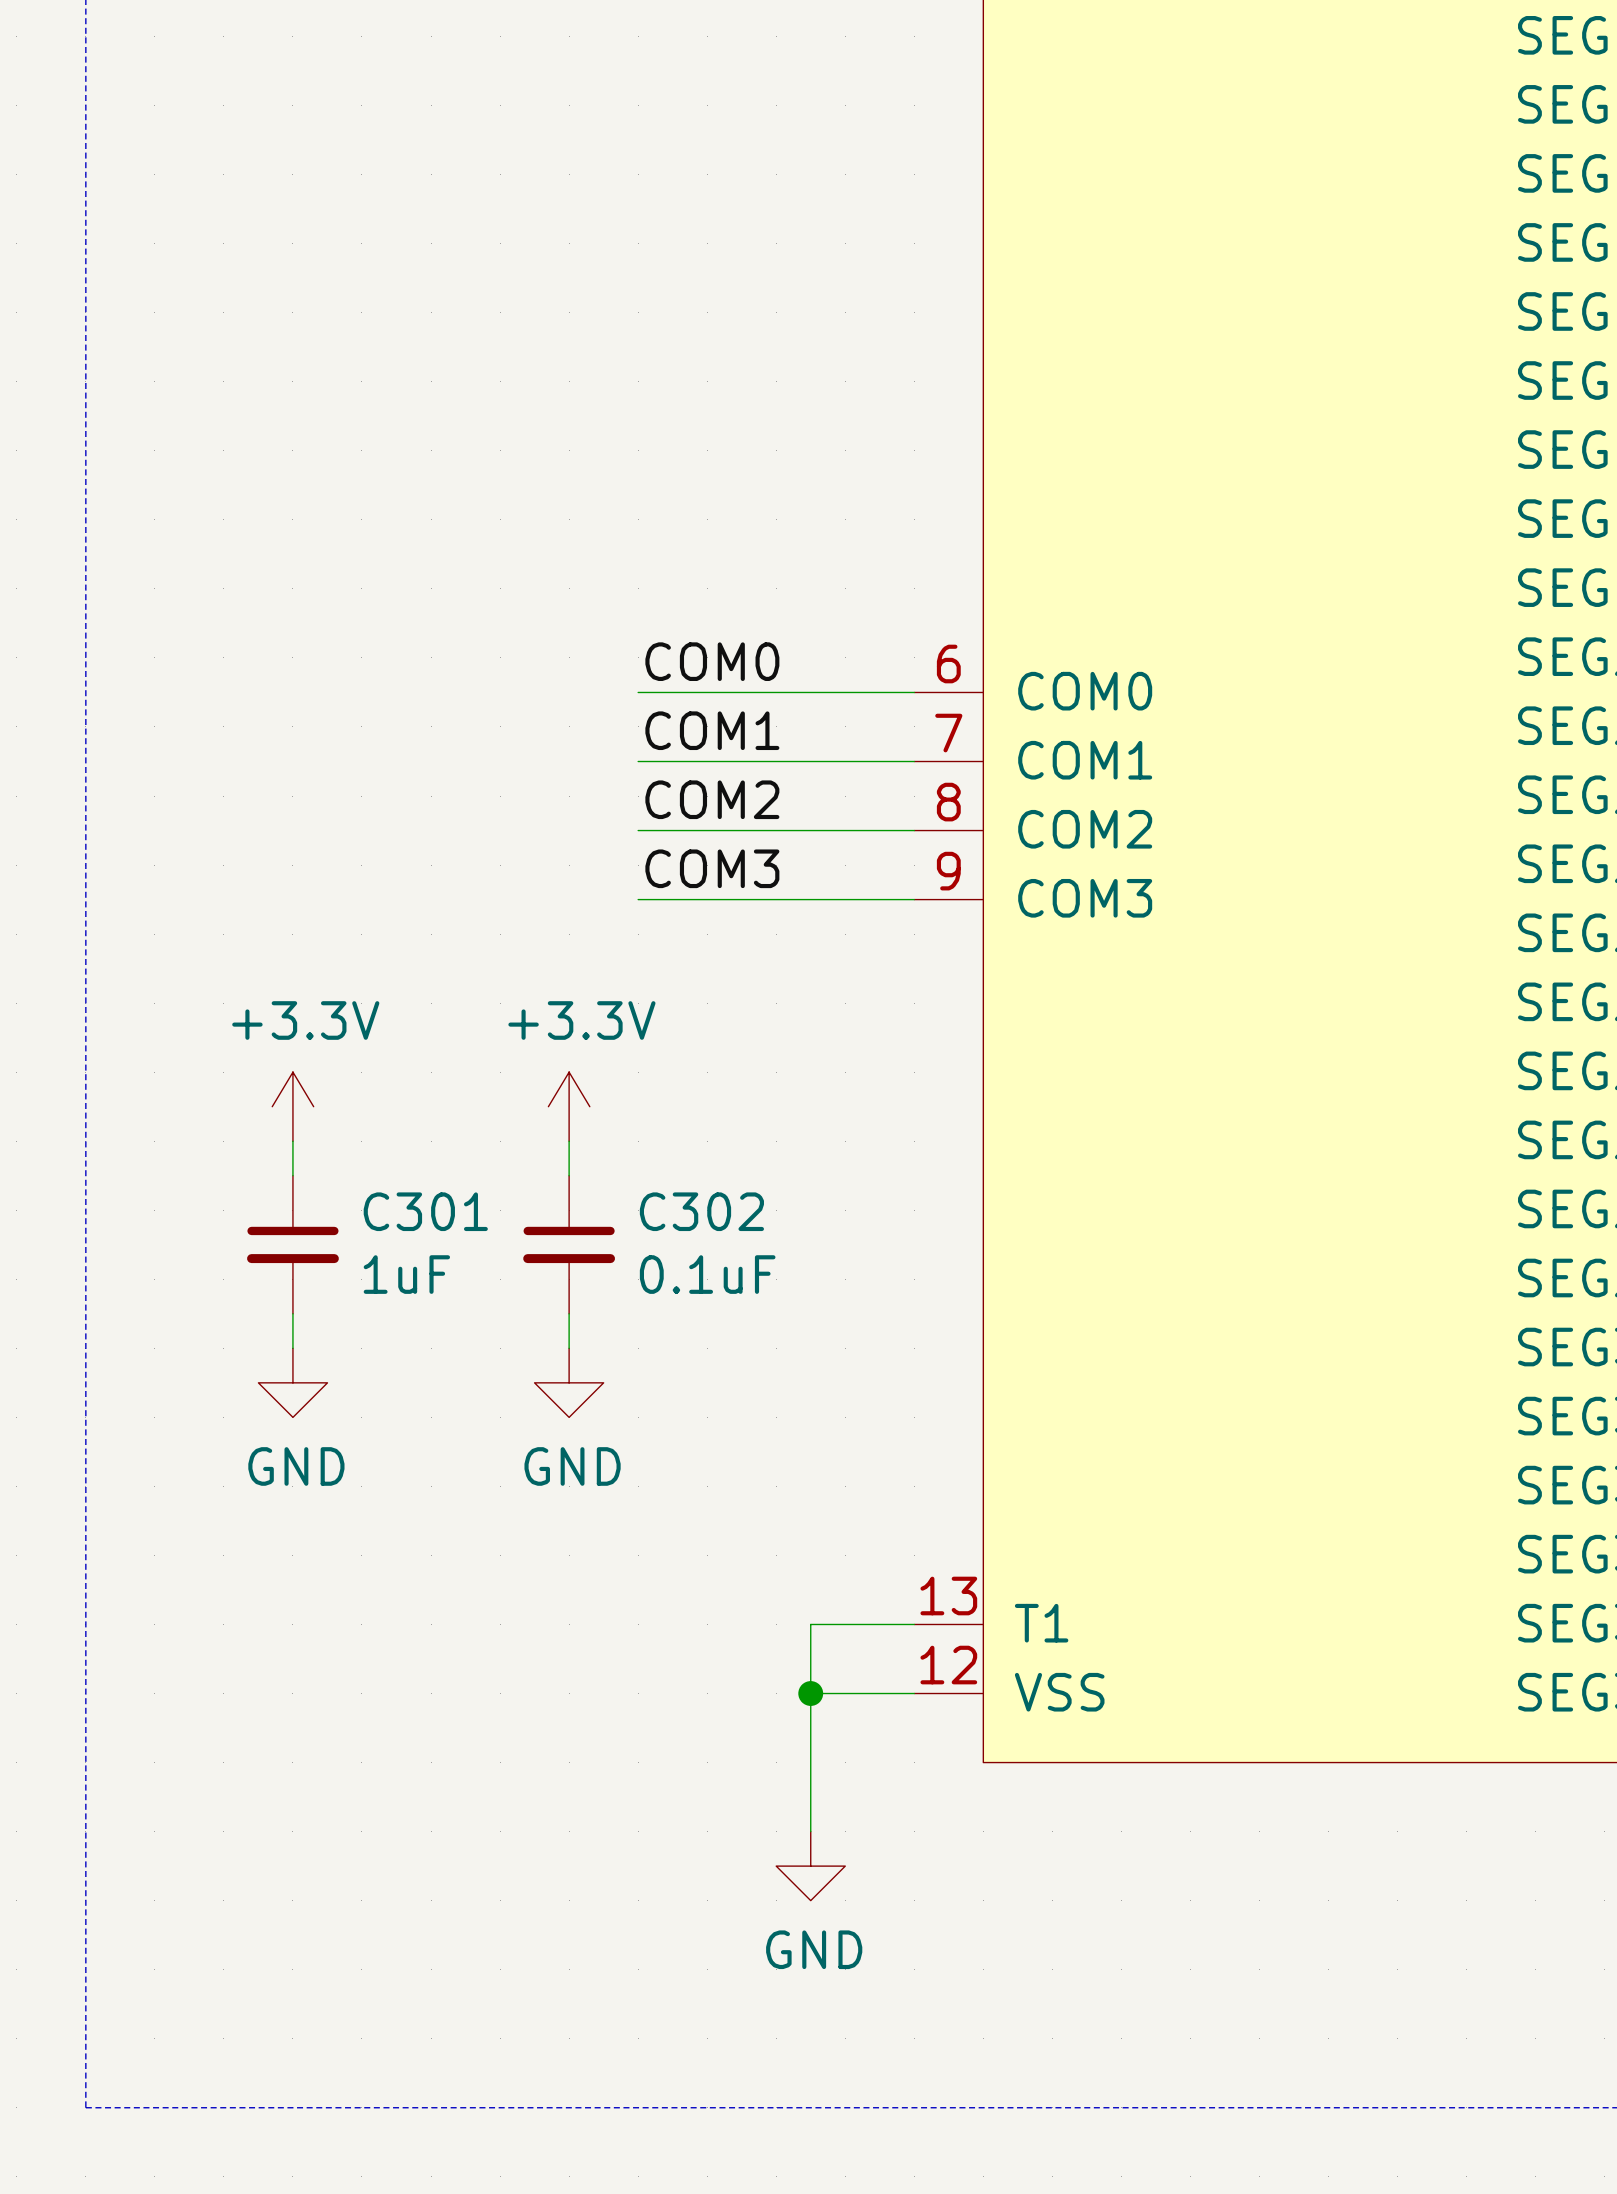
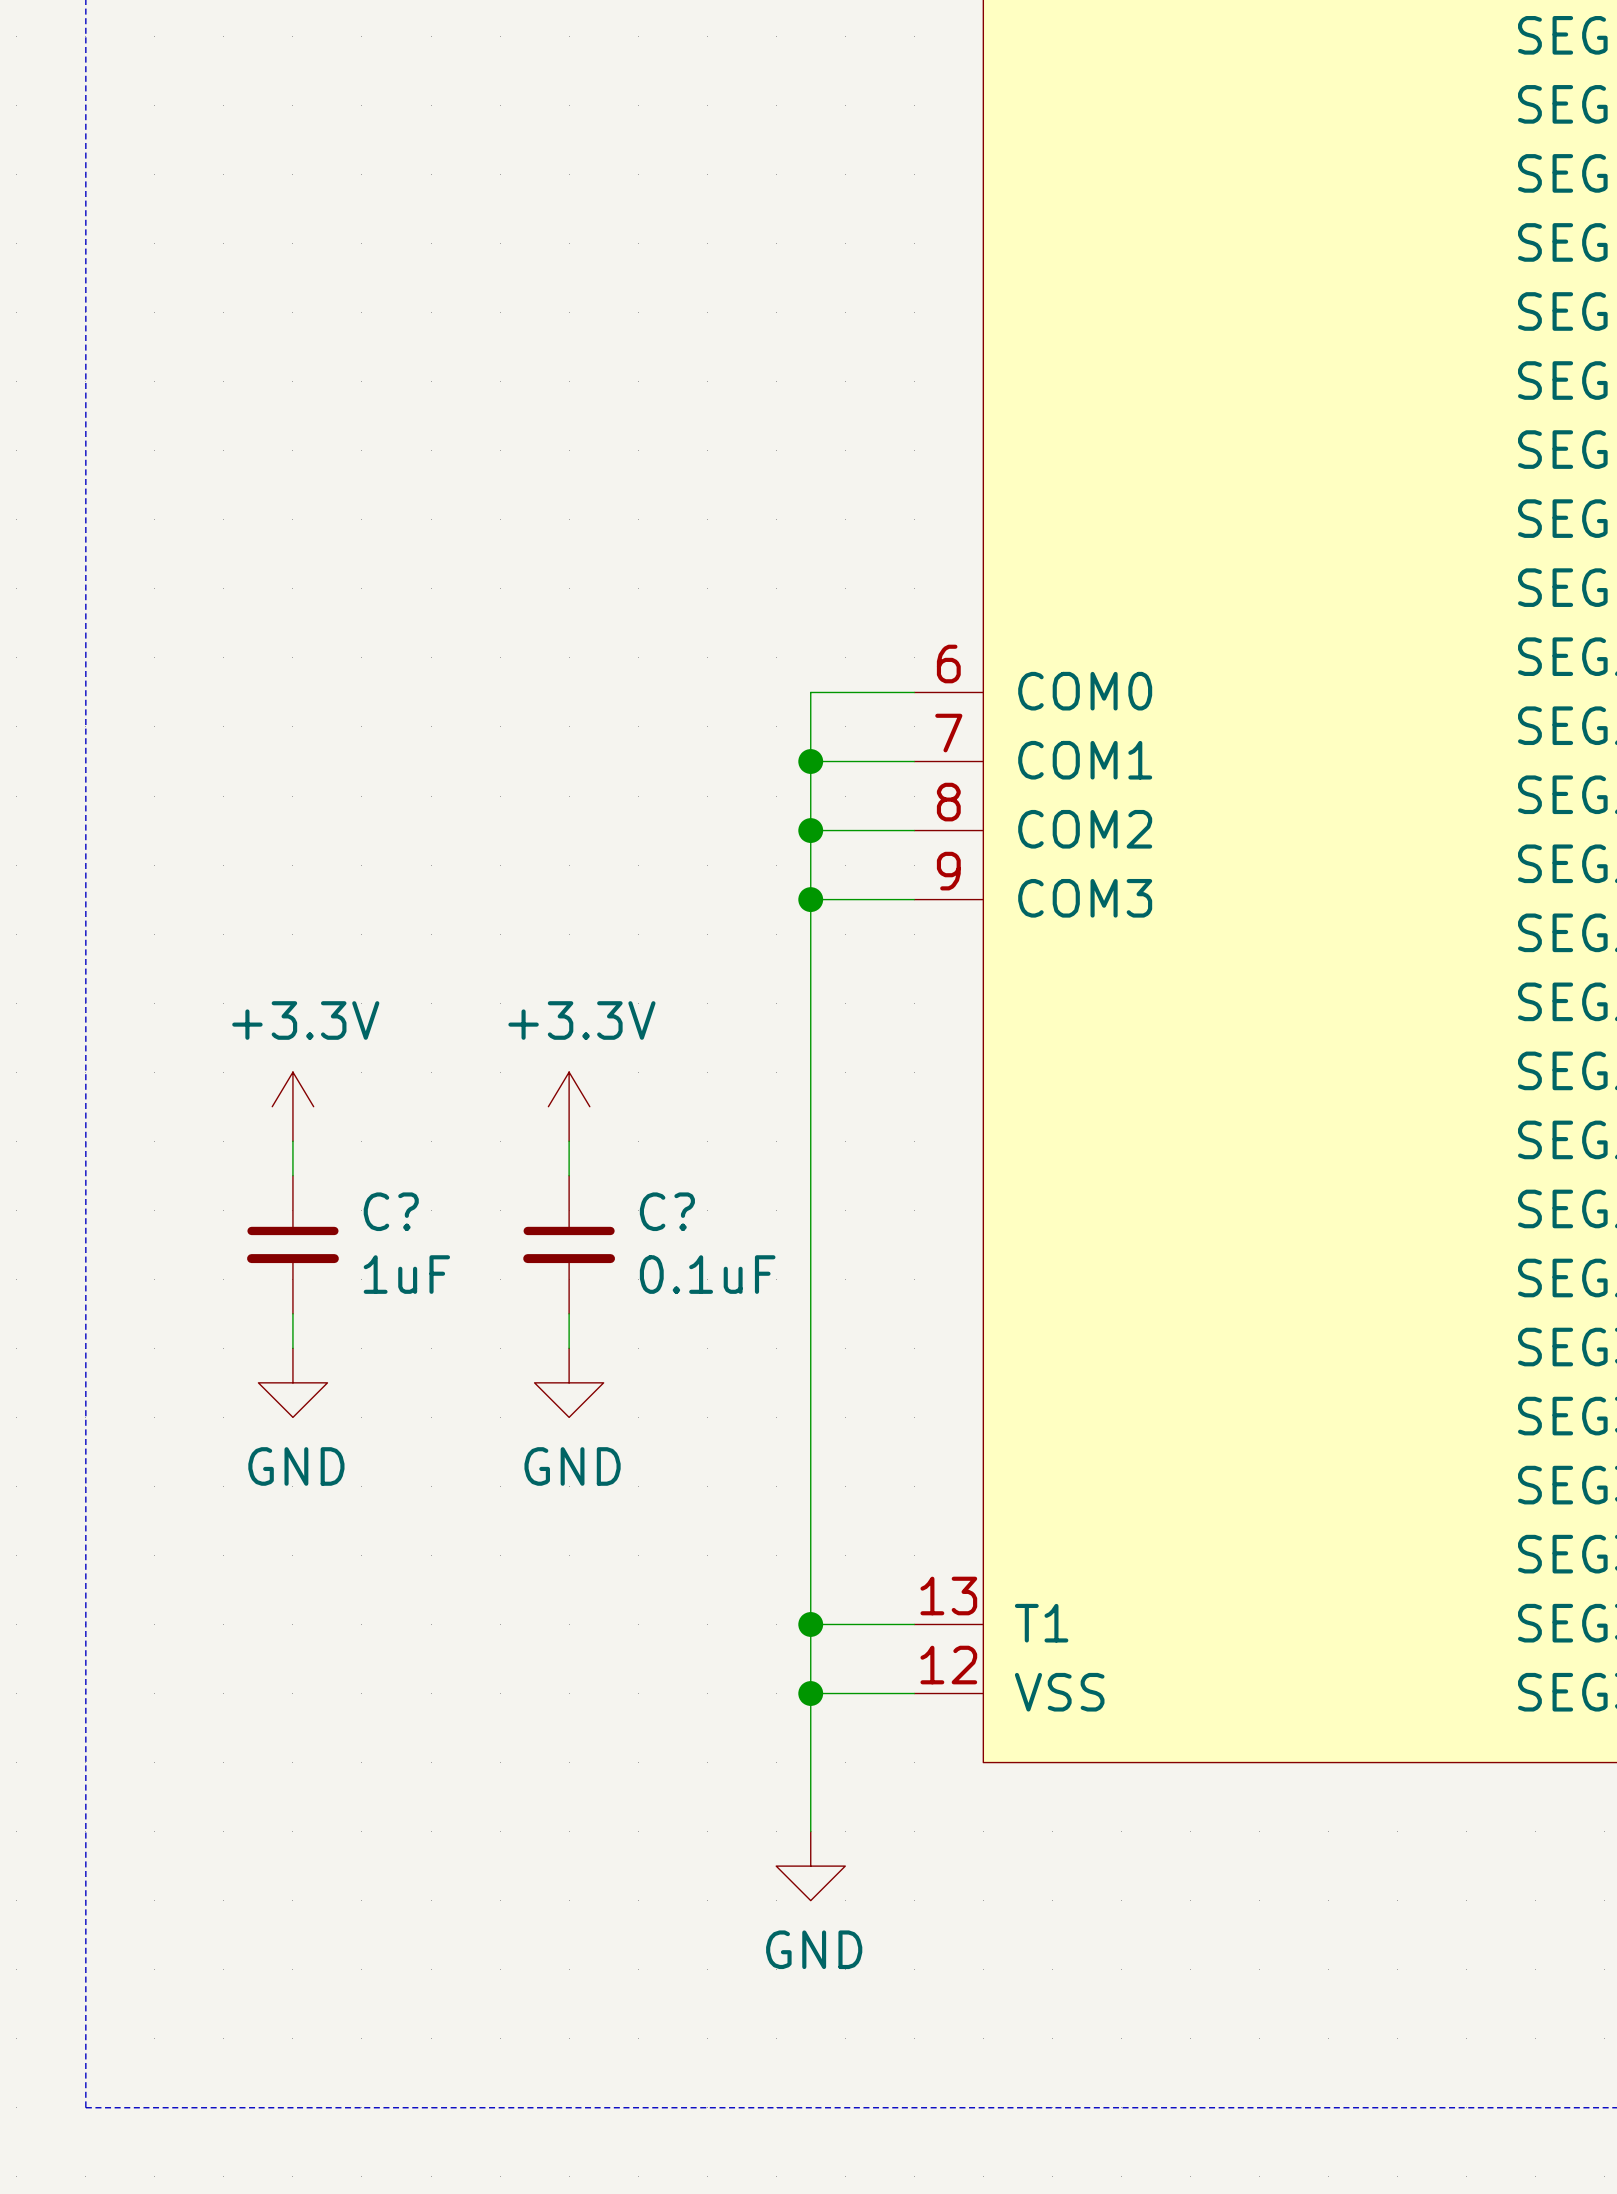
label: COM0 (712, 661) -> none
wire: (638, 692) (810, 692) -> (810, 1624) (810, 692)
label: COM1 (712, 730) -> none
wire: (638, 761) (810, 761) -> none
junction: none -> (810, 761)
label: COM2 (712, 799) -> none
wire: (638, 830) (810, 830) -> none
junction: none -> (810, 830)
label: COM3 (712, 868) -> none
wire: (638, 899) (810, 899) -> none
junction: none -> (810, 899)
C301 name: C301 (425, 1211) -> C? (391, 1211)
C302 name: C302 (701, 1211) -> C? (667, 1211)
junction: none -> (810, 1624)

